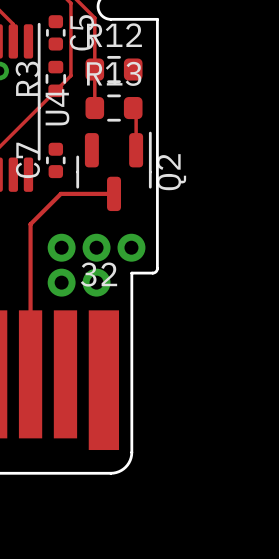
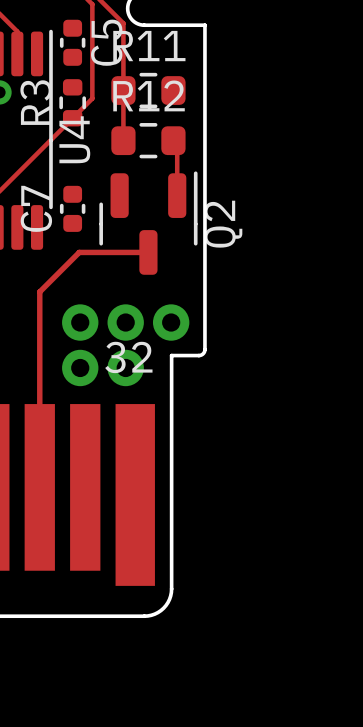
R12 name: R12 (114, 35) -> R11 (149, 46)
R13 name: R13 (114, 73) -> R12 (149, 95)

